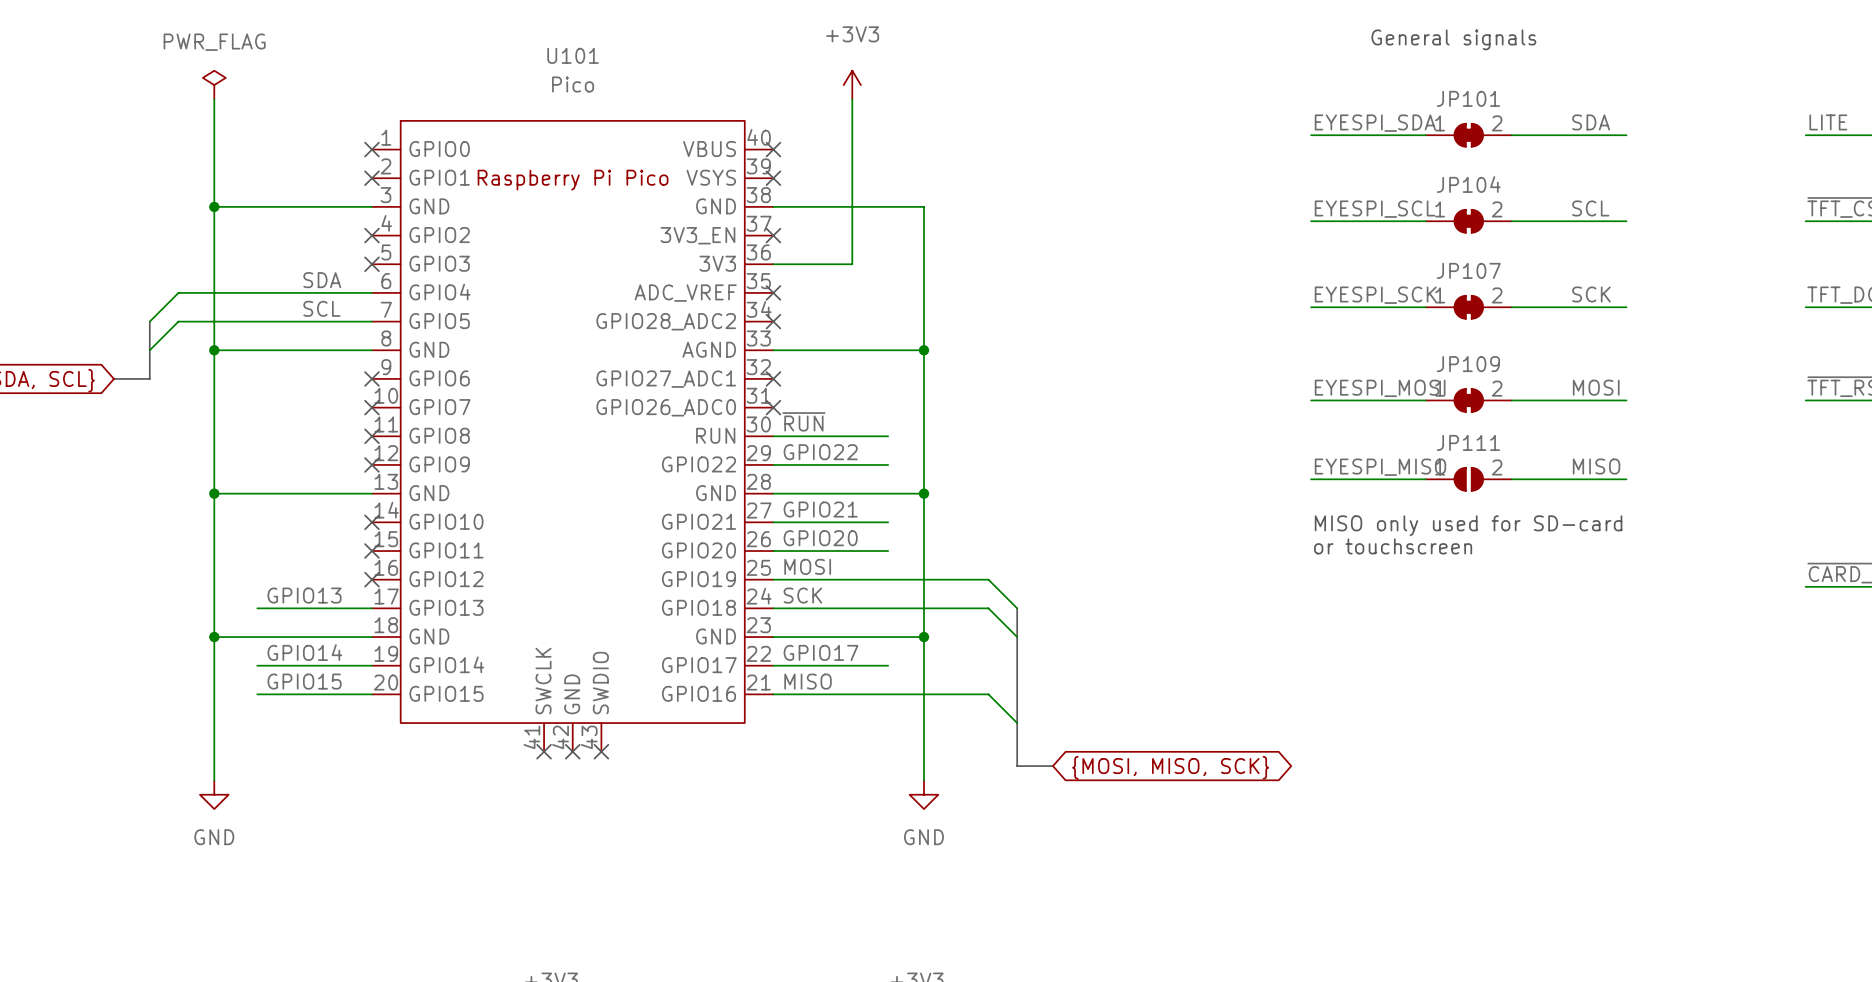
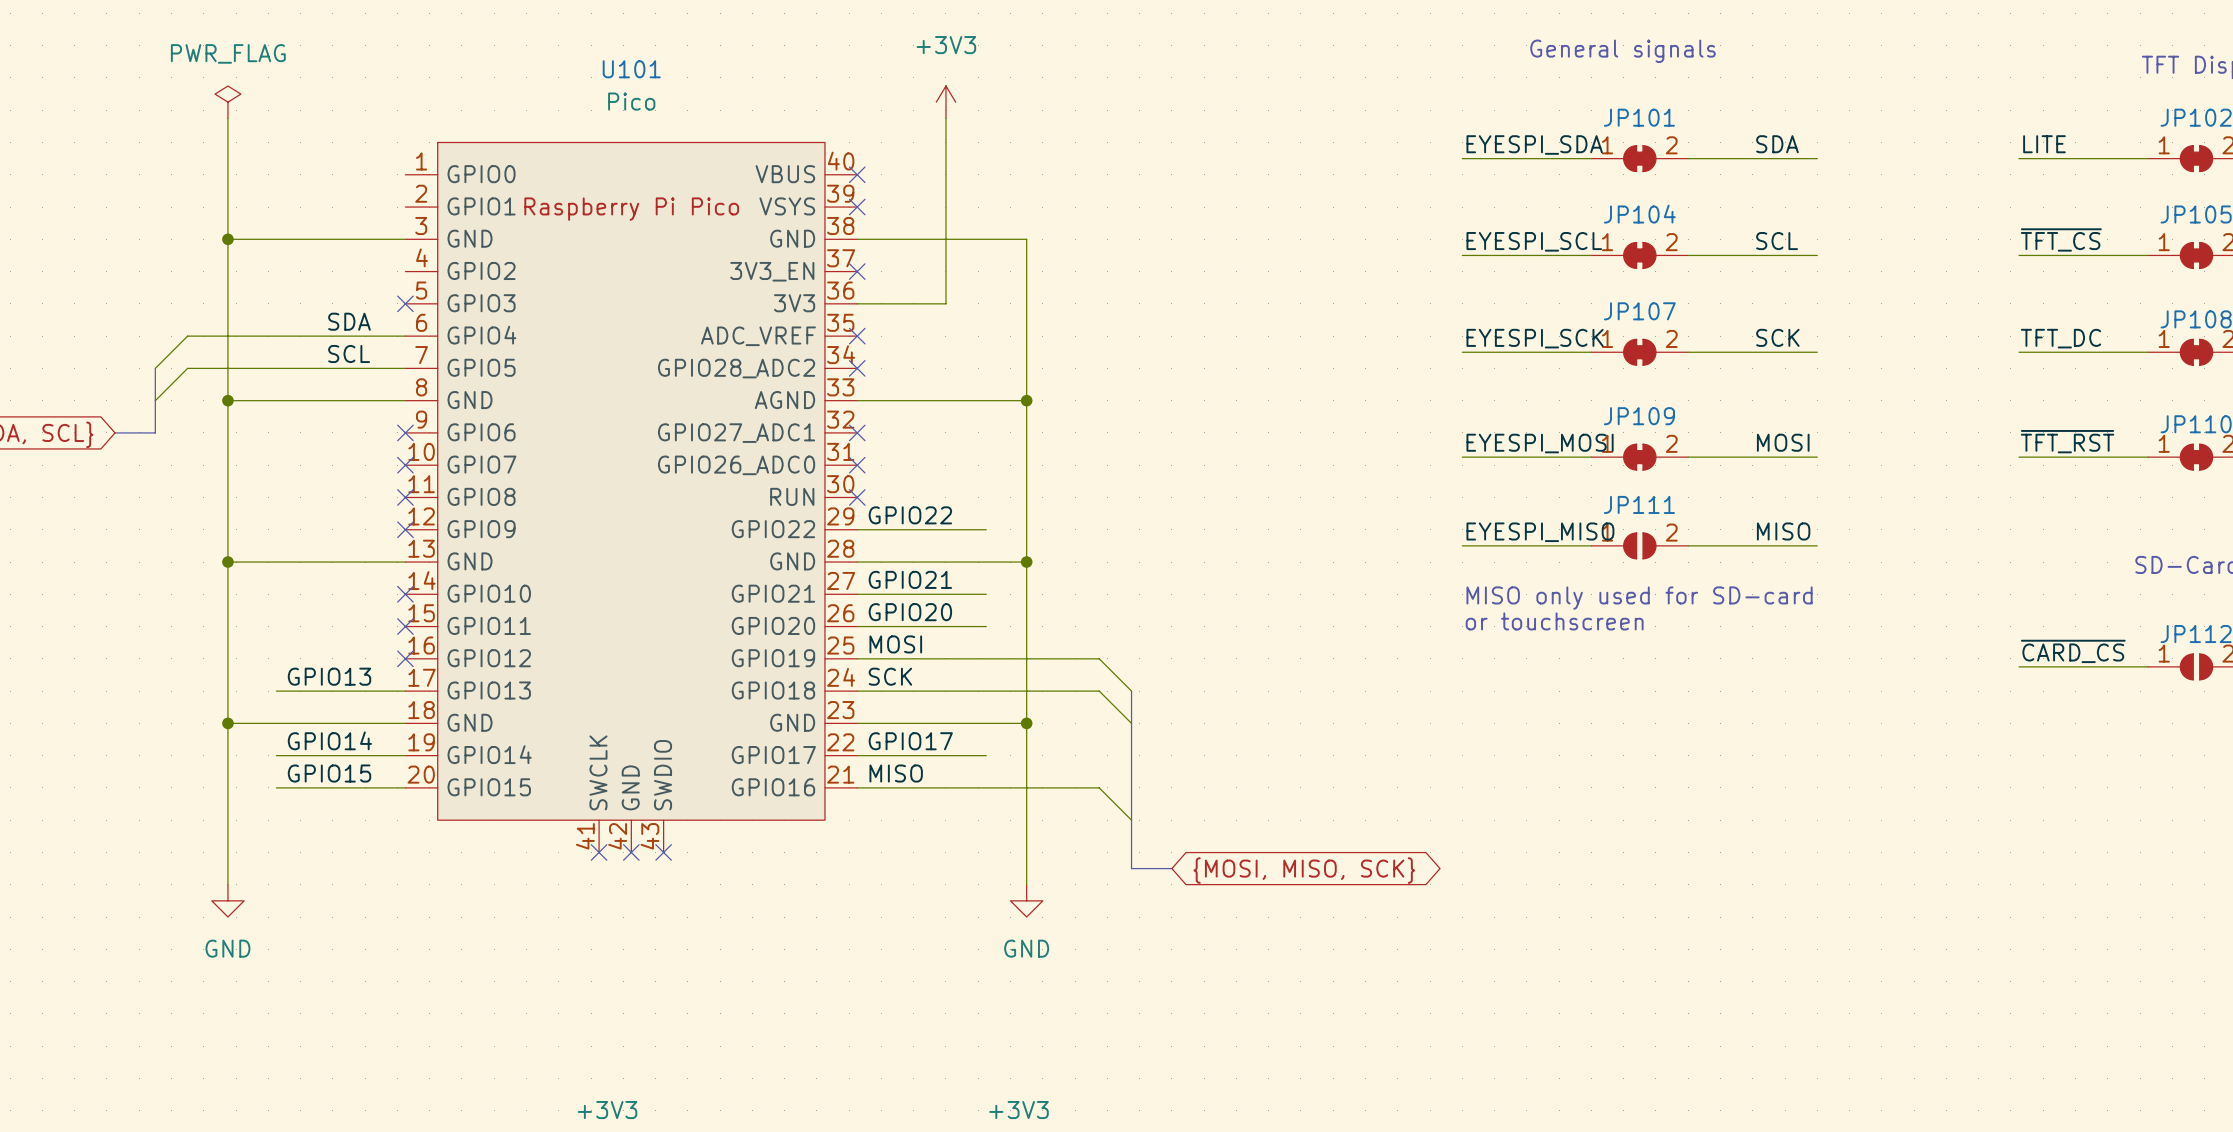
no-connect mark: (372, 149) -> none
no-connect mark: (372, 178) -> none
no-connect mark: (372, 235) -> none
label: ~{RUN} (803, 421) -> none
wire: (773, 436) (888, 436) -> none
no-connect mark: none -> (857, 497)

